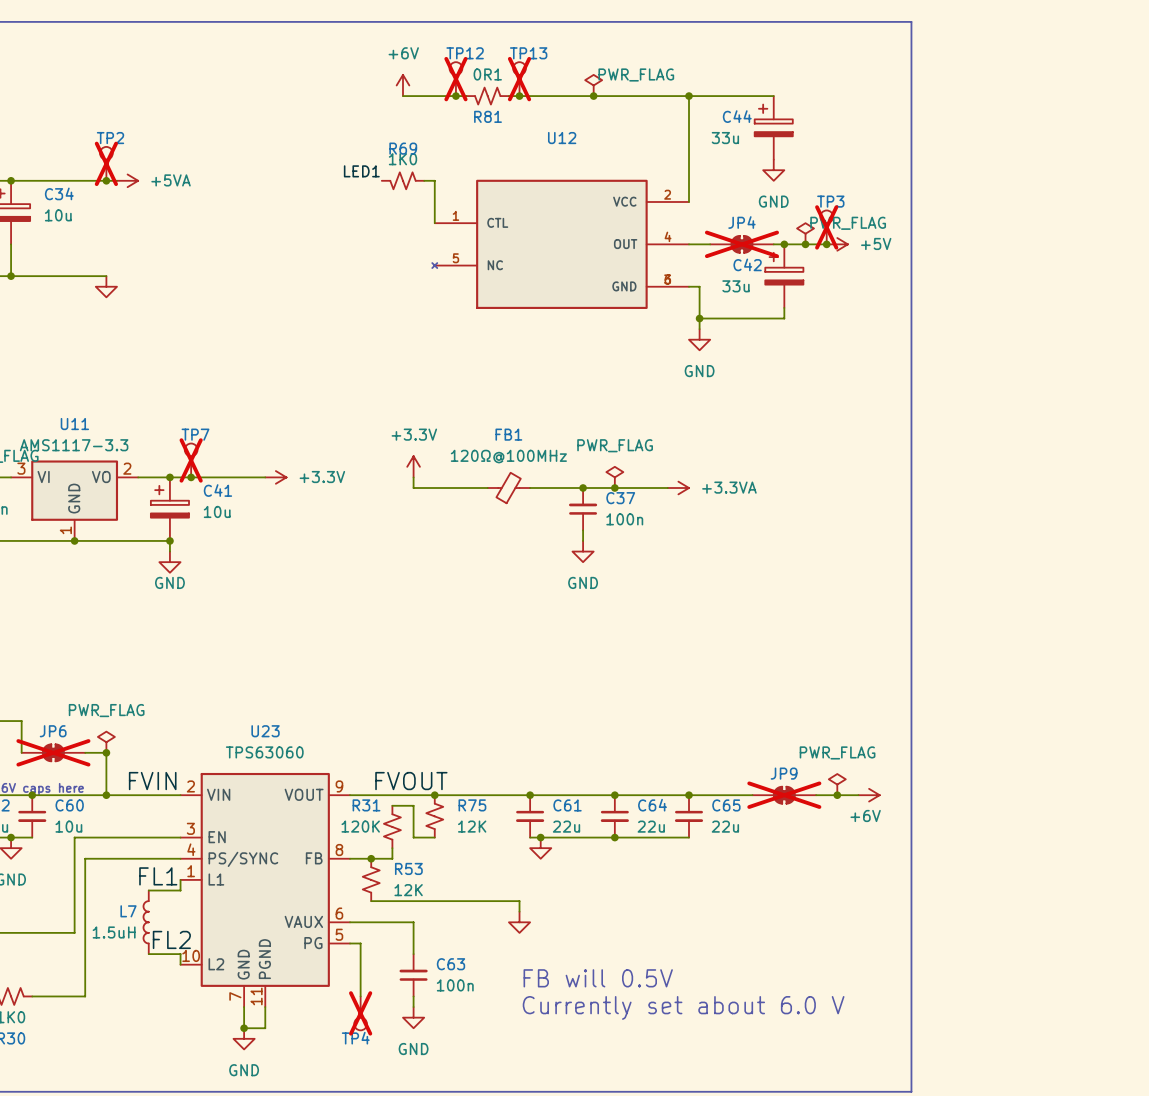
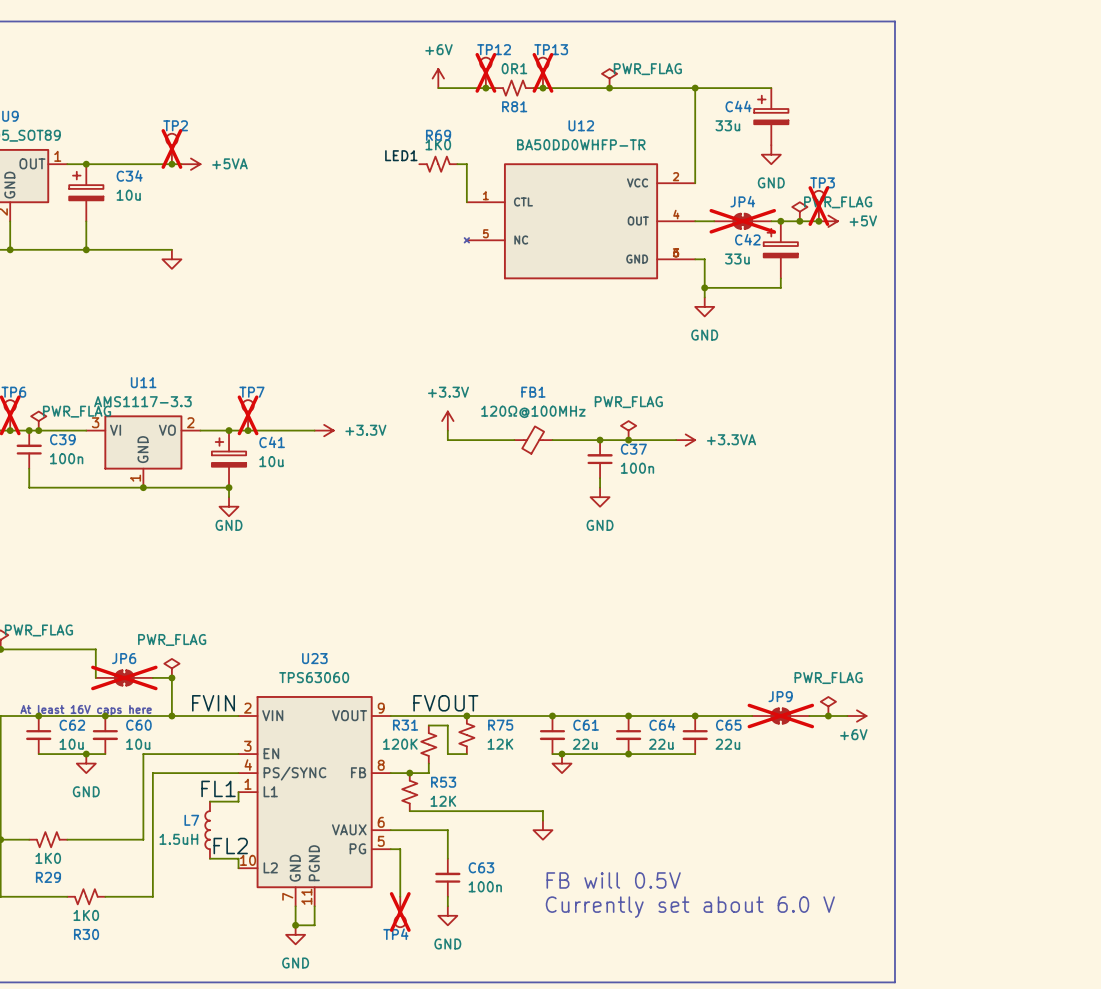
U12 value: none -> BA50DD0WHFP-TR (581, 144)

